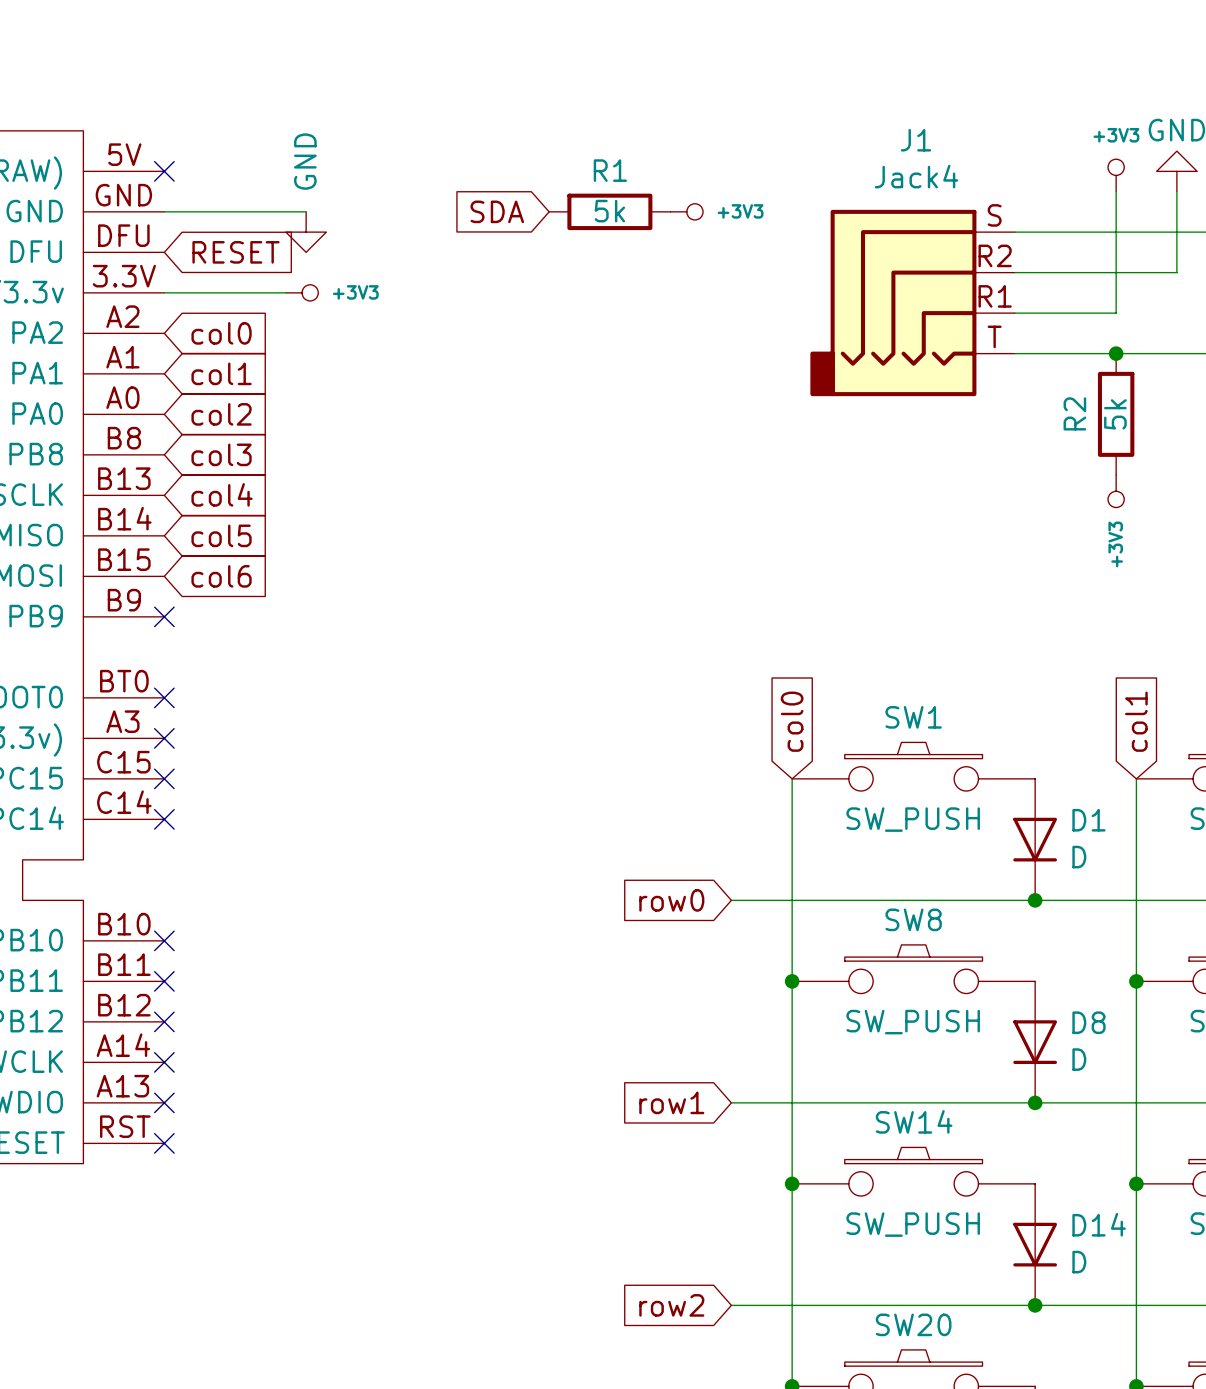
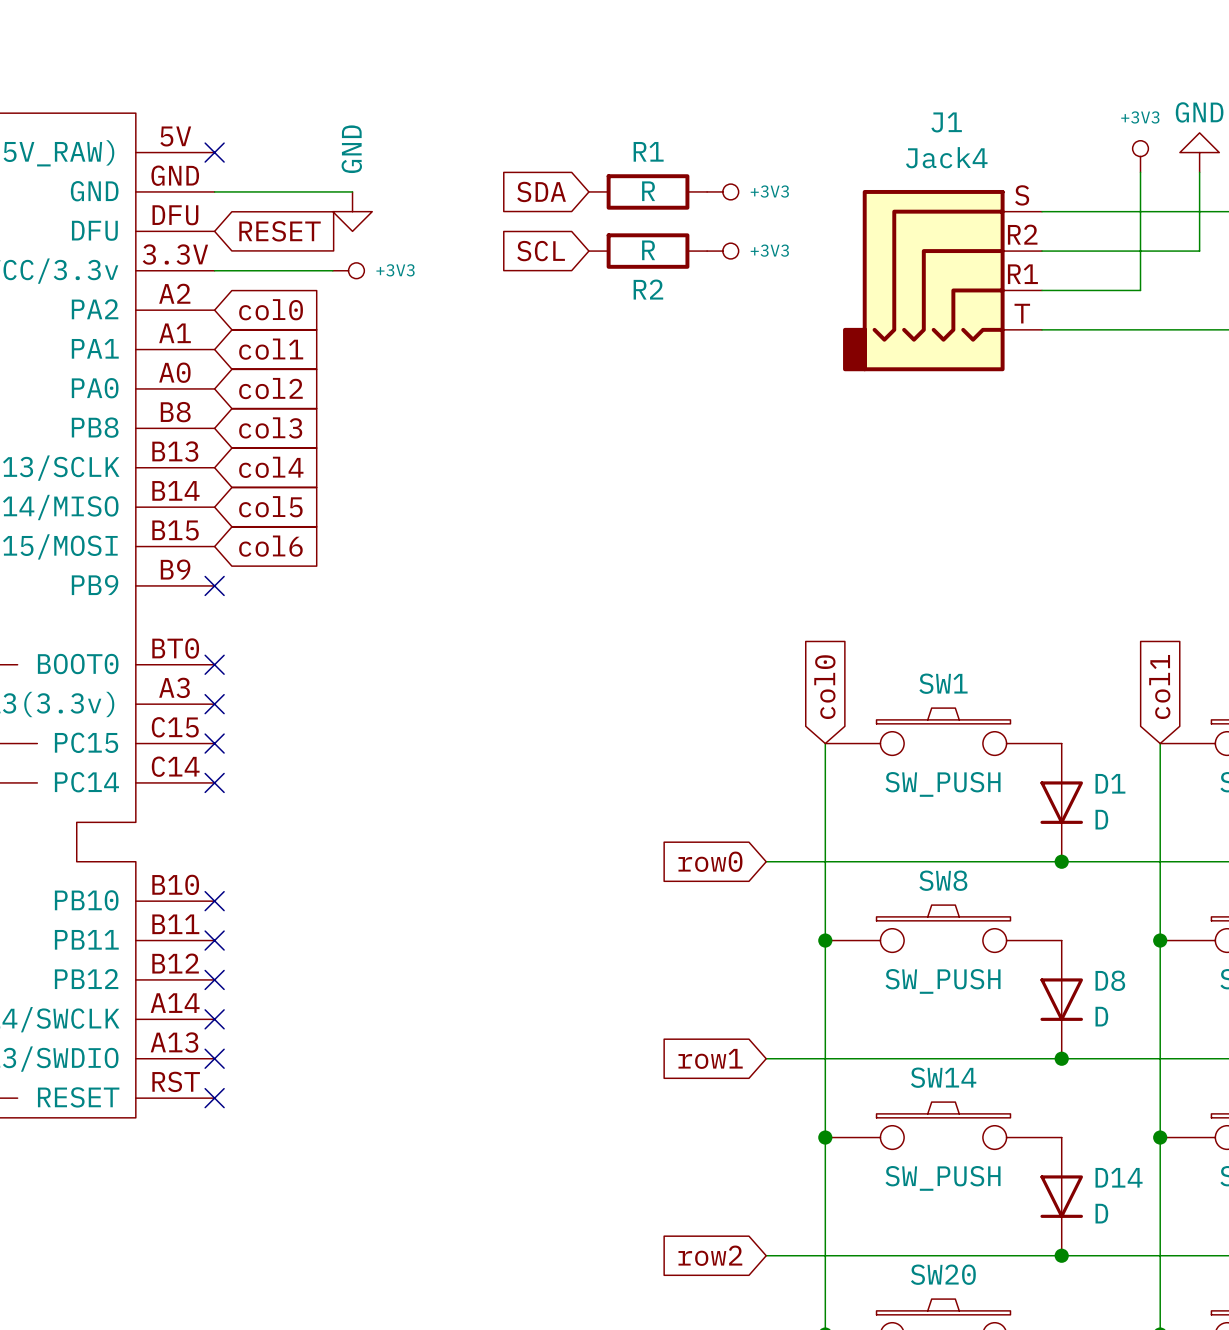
R1 value: 5k (609, 211) -> R (648, 191)
global label: none -> SCL (541, 251)
power symbol: none -> +3V3 (722, 251)
junction: (1116, 353) -> none
R2 name position: R2 (1074, 413) -> R2 (648, 289)
R2 value: 5k (1115, 414) -> R (648, 250)
R2 rotation: 0° (1116, 414) -> 90° clockwise (648, 251)
R2 position: (1116, 414) -> (648, 251)
power symbol: +3V3 (1116, 491) -> none

